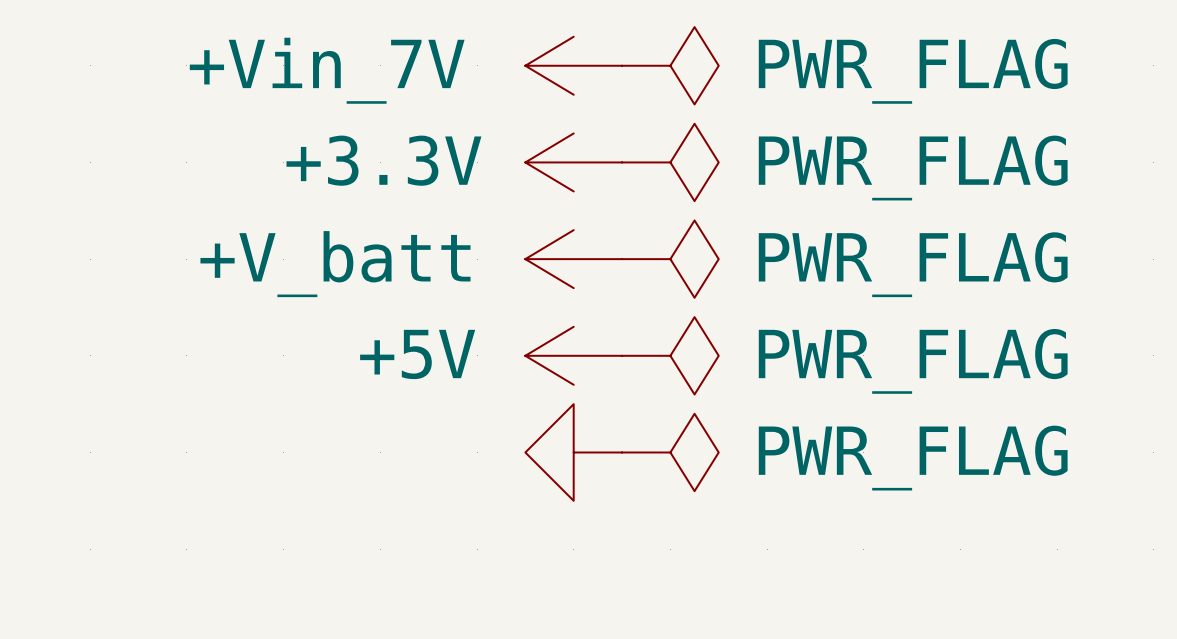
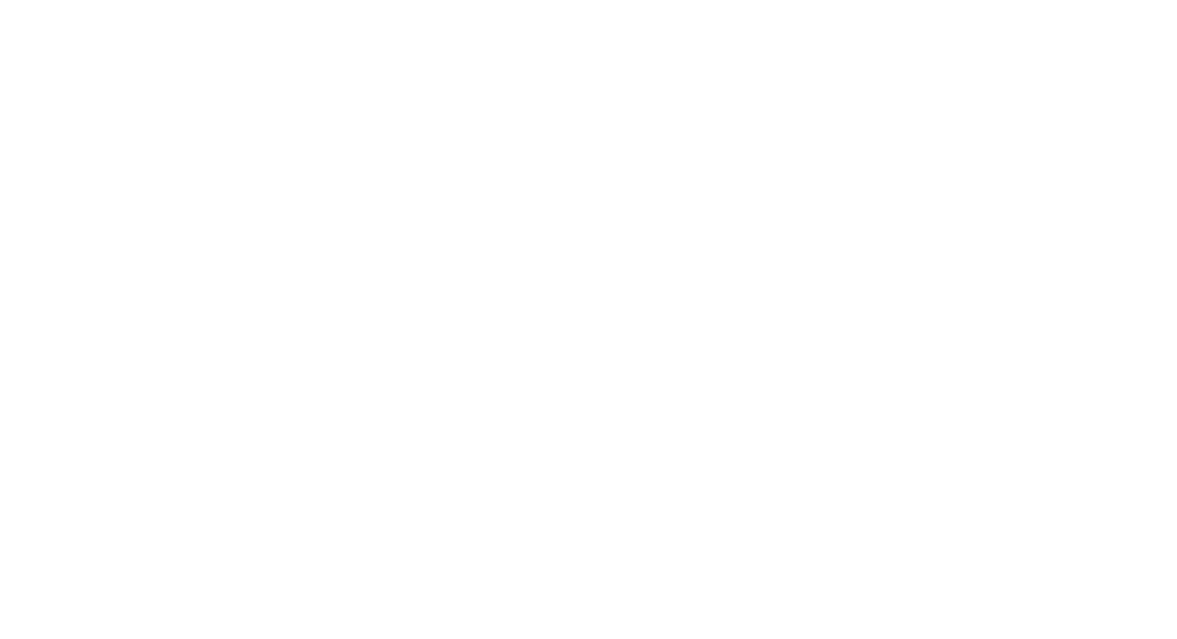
power symbol: +Vin_7V (573, 65) -> none
power symbol: PWR_FLAG (670, 65) -> none
power symbol: +3.3V (573, 162) -> none
power symbol: PWR_FLAG (670, 162) -> none
power symbol: +V_batt (573, 259) -> none
power symbol: PWR_FLAG (670, 259) -> none
power symbol: +5V (573, 355) -> none
power symbol: PWR_FLAG (670, 355) -> none
power symbol: (573, 452) -> none
power symbol: PWR_FLAG (670, 452) -> none

